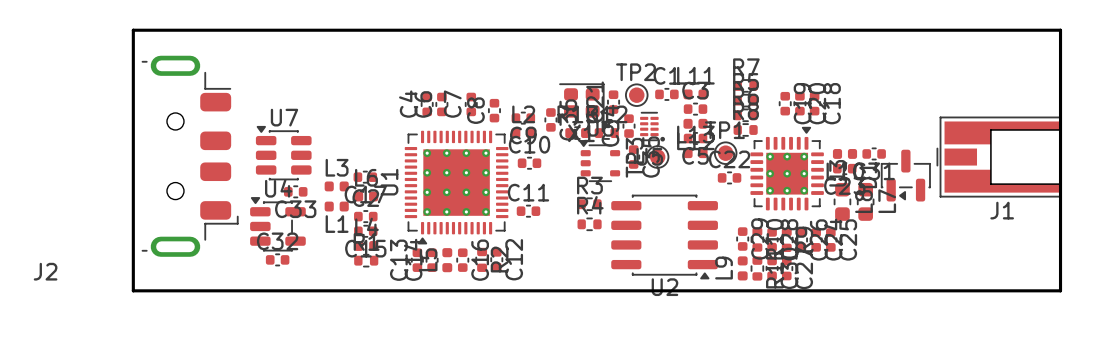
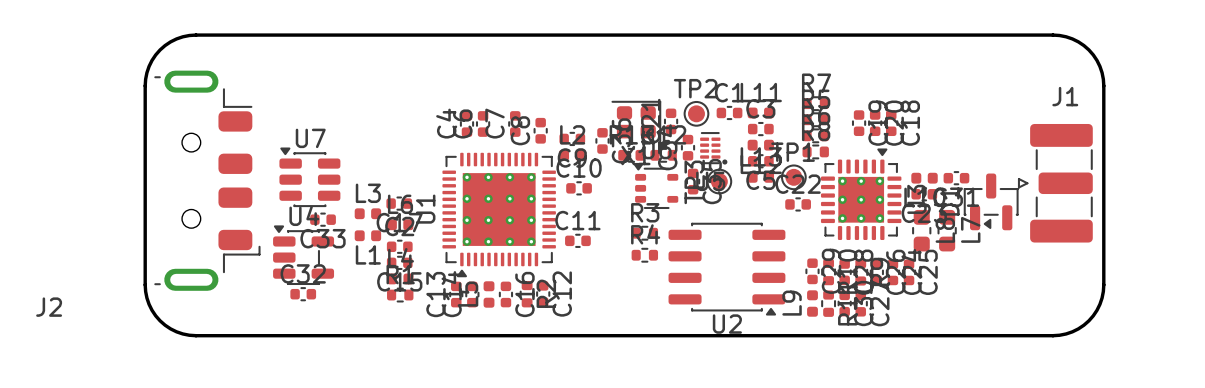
board edge: (133, 69) (133, 30) (1060, 30) (1060, 290) (133, 290) (133, 251) -> (145, 85) (149, 66) (160, 49) (176, 38) (196, 35) (1052, 35) (1072, 38) (1088, 49) (1099, 66) (1103, 85) (1103, 291) (1099, 304) (1088, 320) (1078, 328) (1066, 333) (1052, 335) (196, 335) (176, 331) (160, 320) (149, 304) (145, 284)
J1 footprint: [936, 116, 1062, 198] -> [1017, 123, 1093, 243]
J1 name position: J1 (1002, 210) -> J1 (1065, 96)

